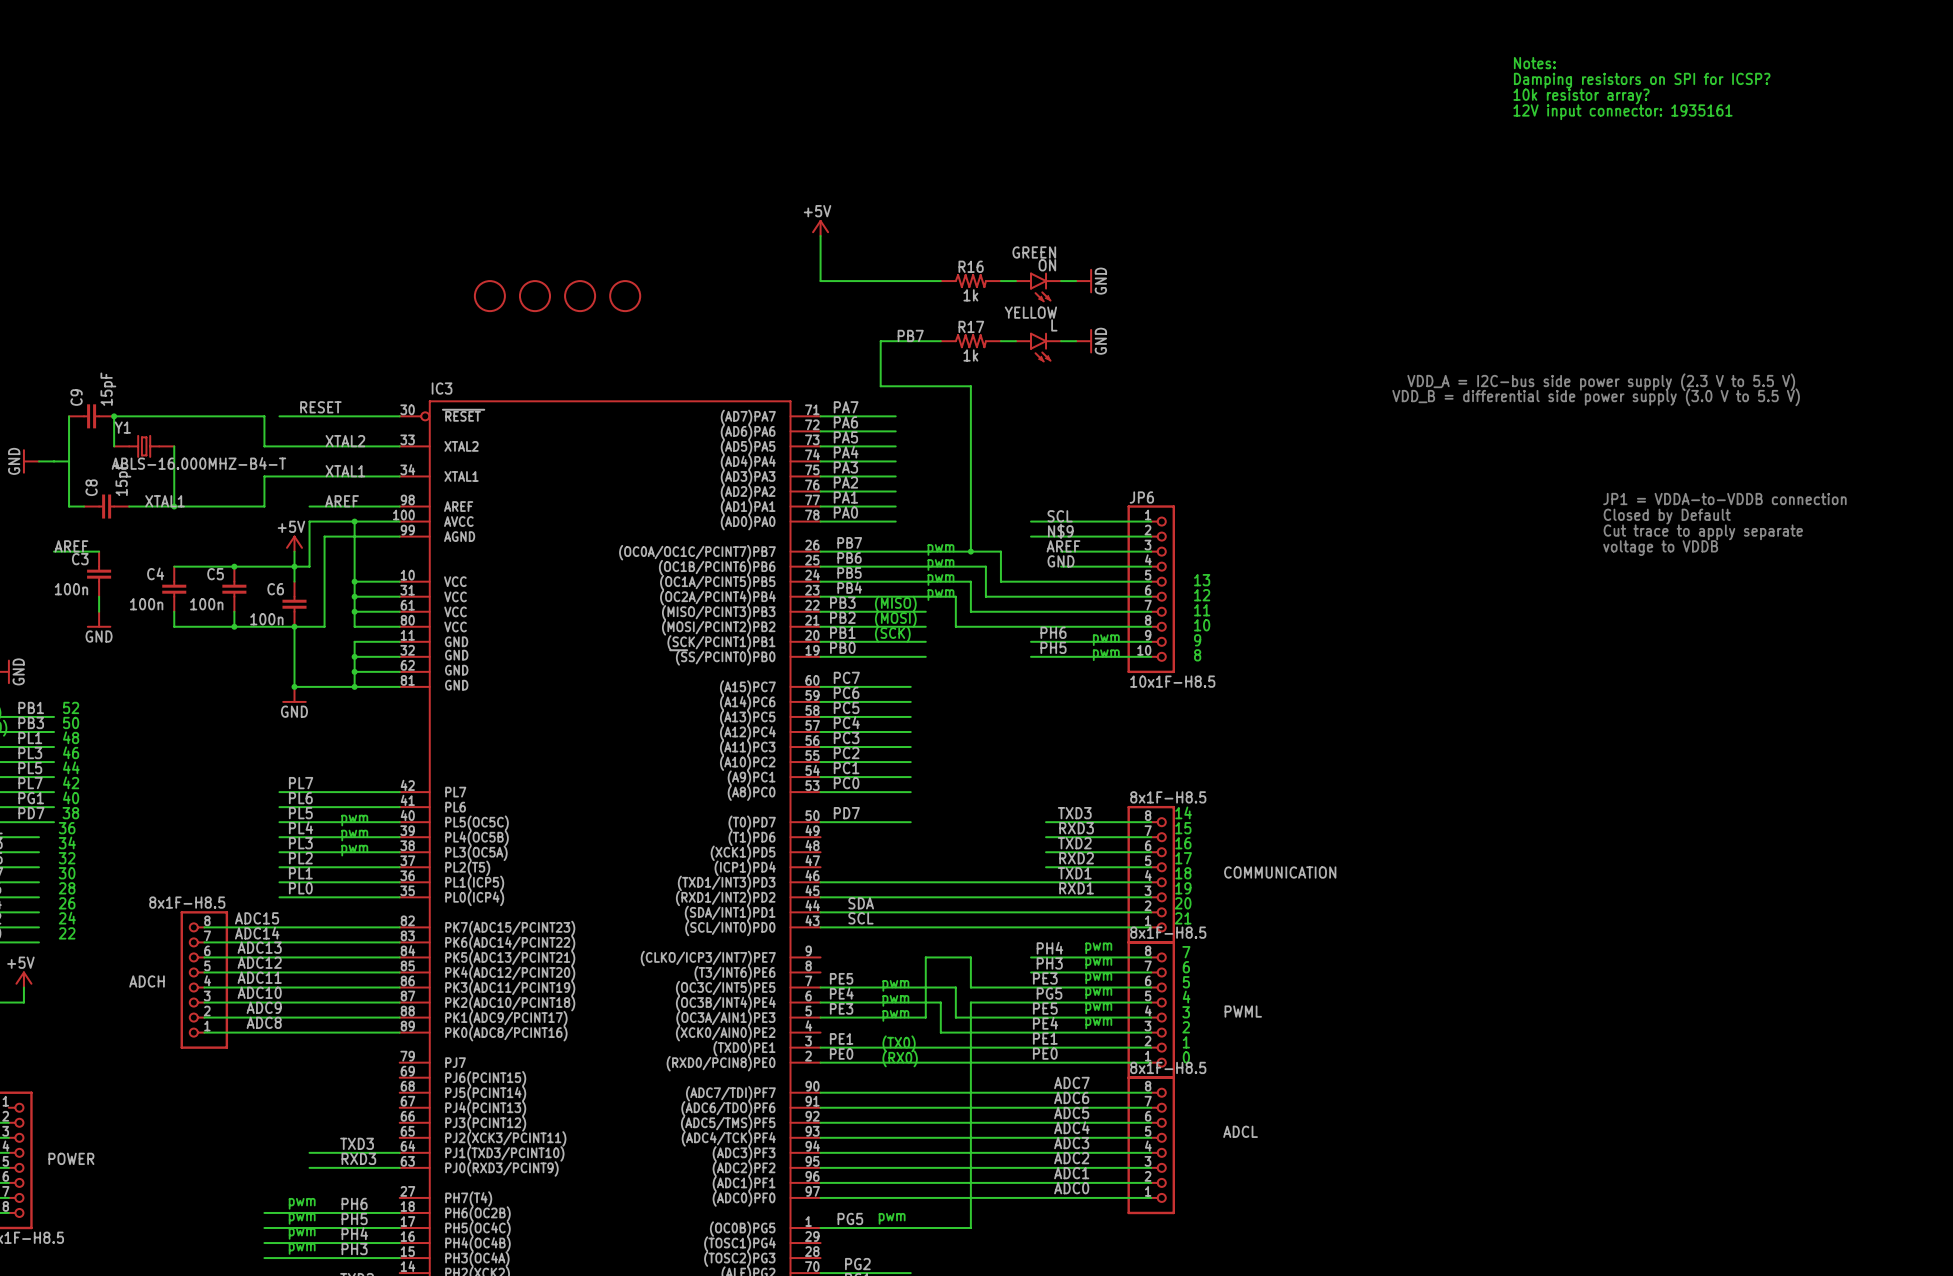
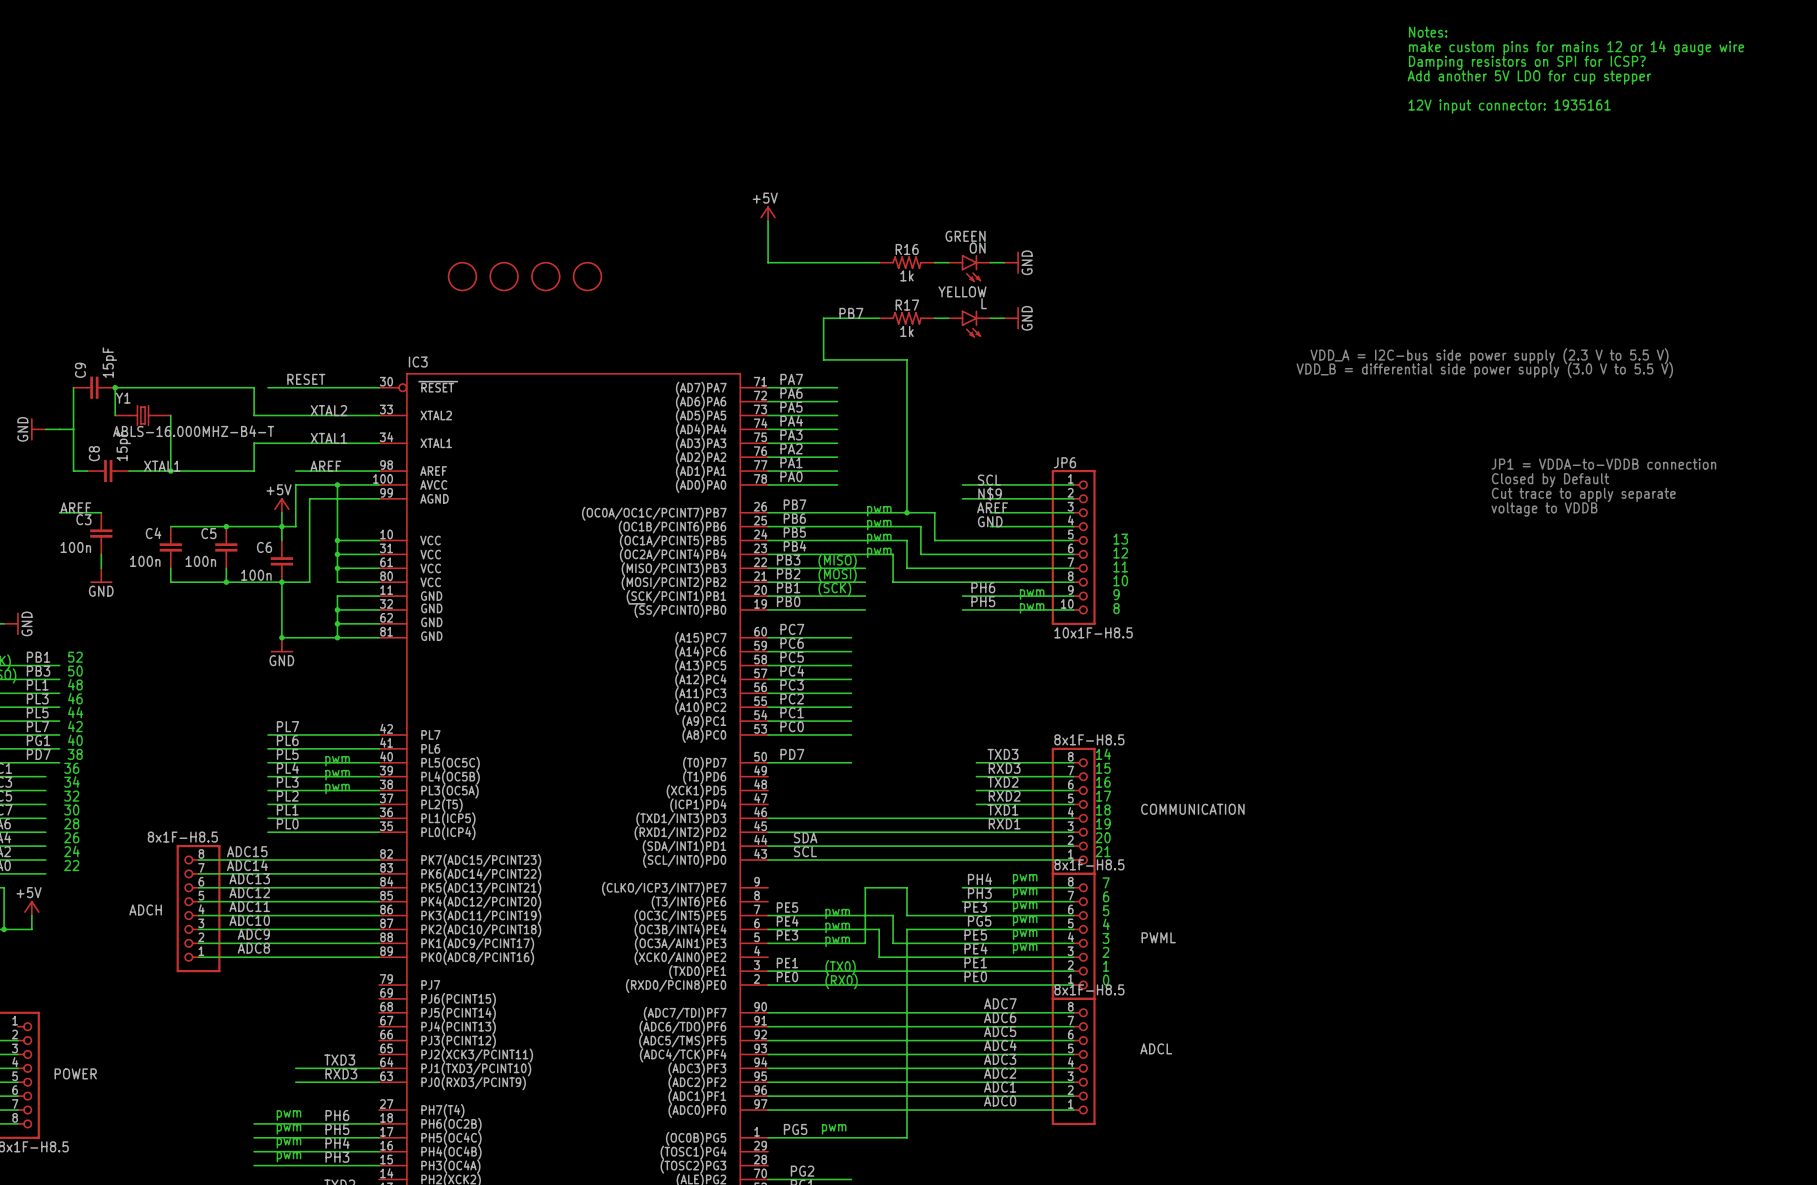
text: none -> Notes: (1428, 32)
text: none -> make custom pins for mains 12 or 14 gauge wire (1576, 48)
text: Notes: (1534, 63) -> Damping resistors on SPI for ICSP? (1527, 62)
text: Damping resistors on SPI for ICSP? (1642, 80) -> Add another 5V LDO for cup stepper (1529, 77)
text: 10k resistor array? (1581, 96) -> none

